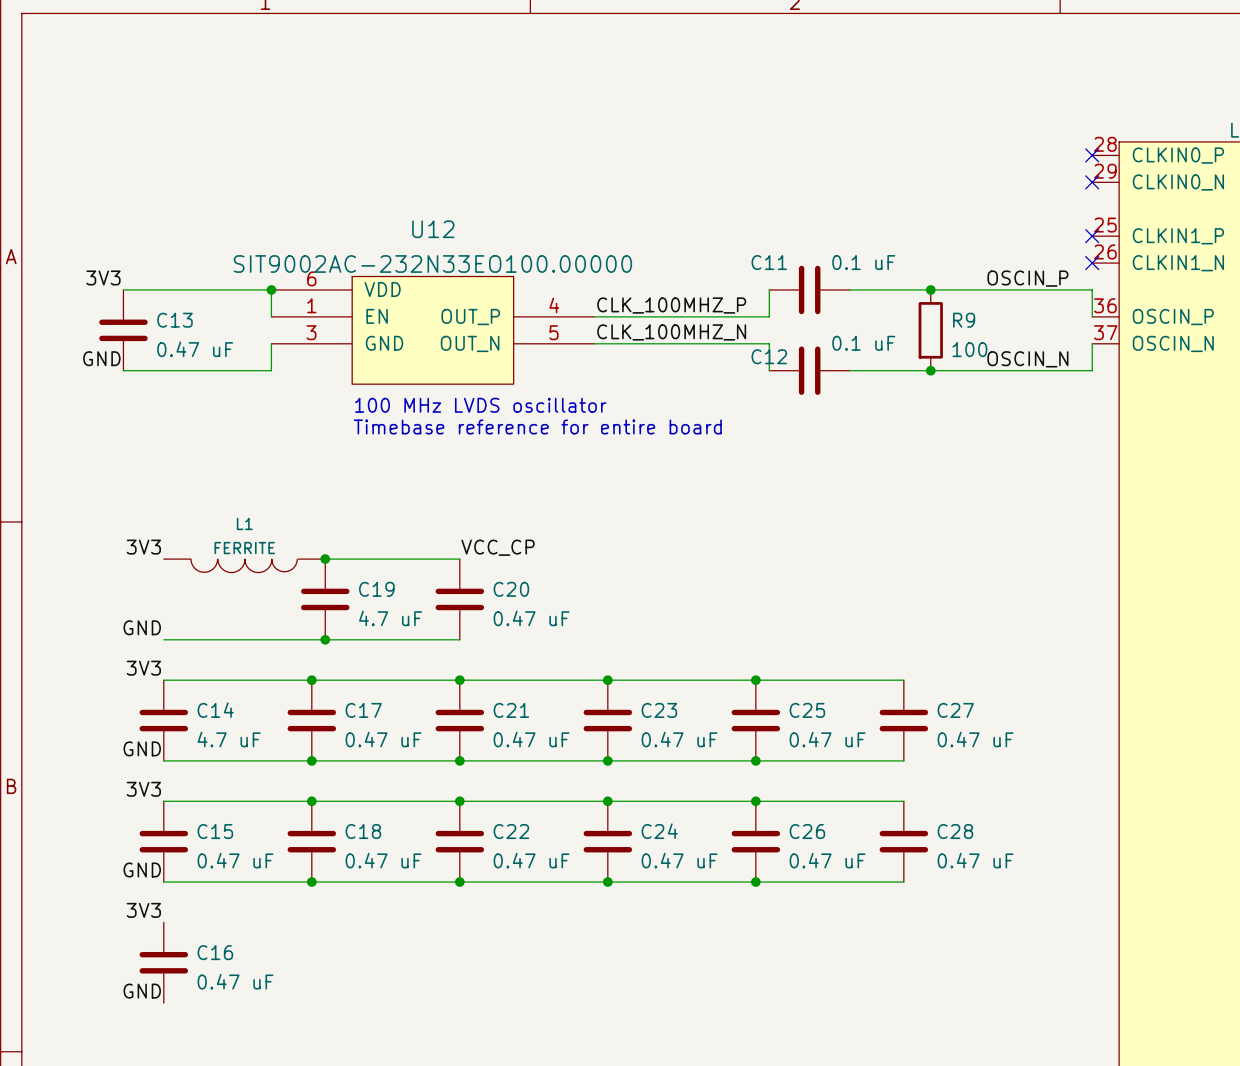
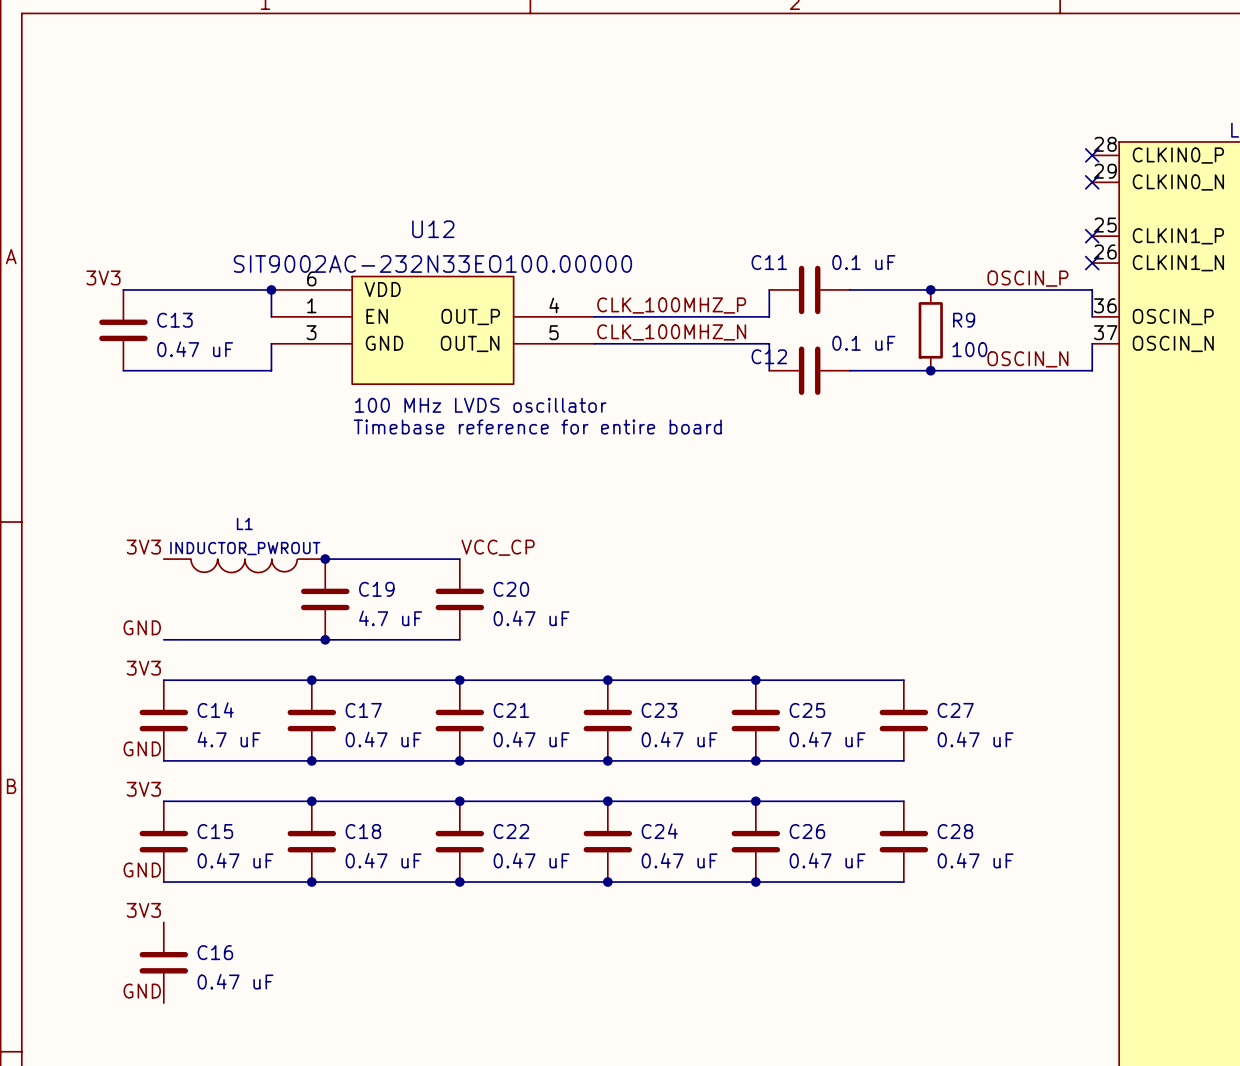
label: GND (101, 358) -> none
L1 value: FERRITE (244, 548) -> INDUCTOR_PWROUT (245, 548)

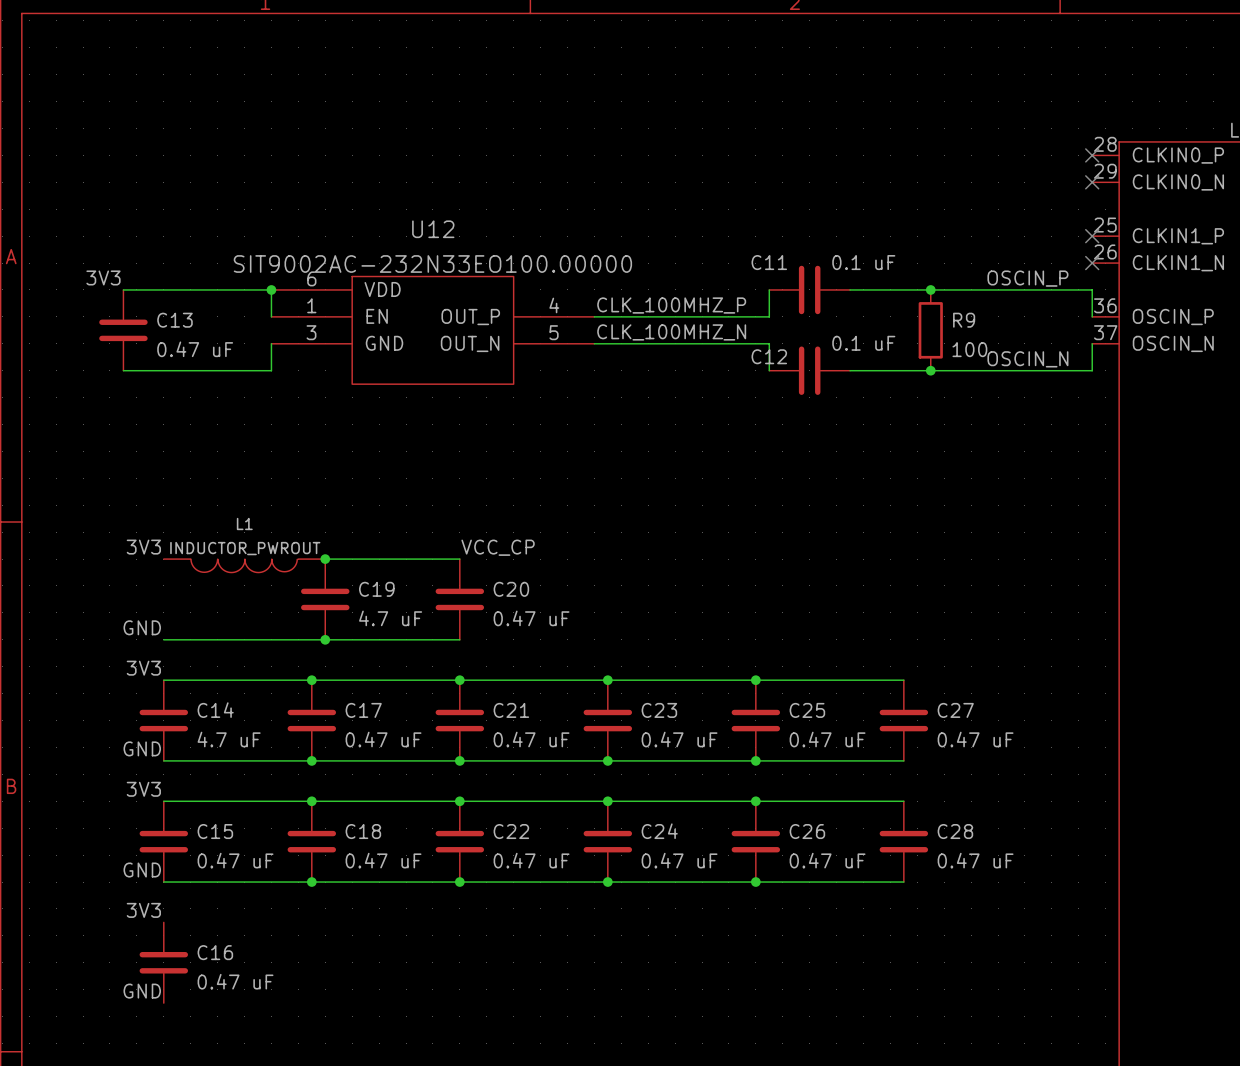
text: 100 MHz LVDS oscillator (480, 405) -> none
text: Timebase reference for entire board (537, 426) -> none

